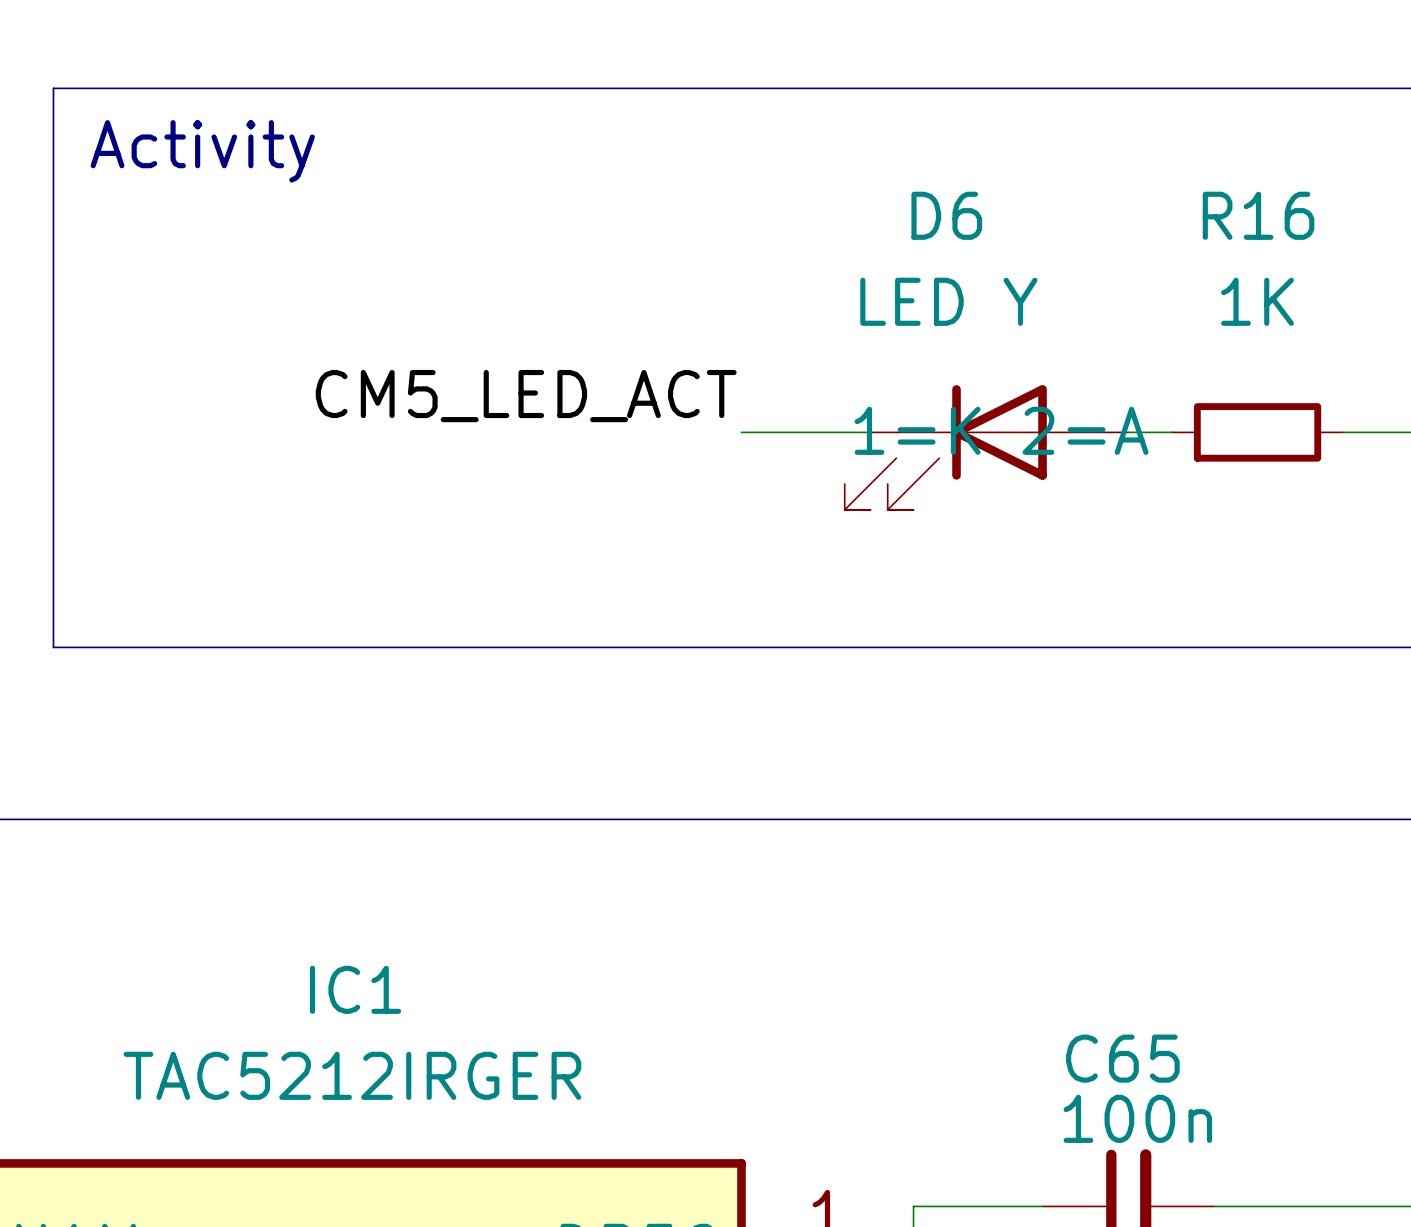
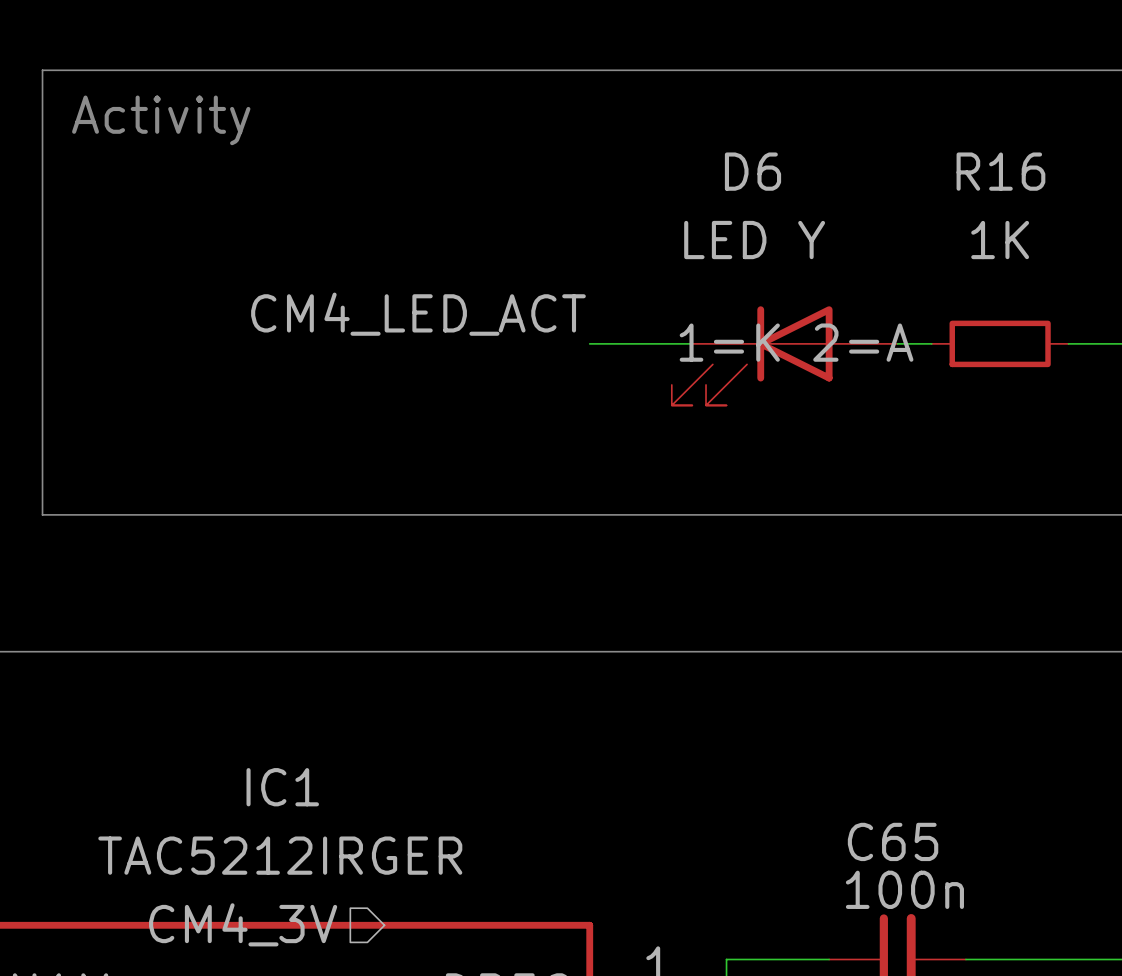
label: CM5_LED_ACT (526, 396) -> CM4_LED_ACT (418, 314)
hierarchical label: none -> CM4_3V (243, 924)

